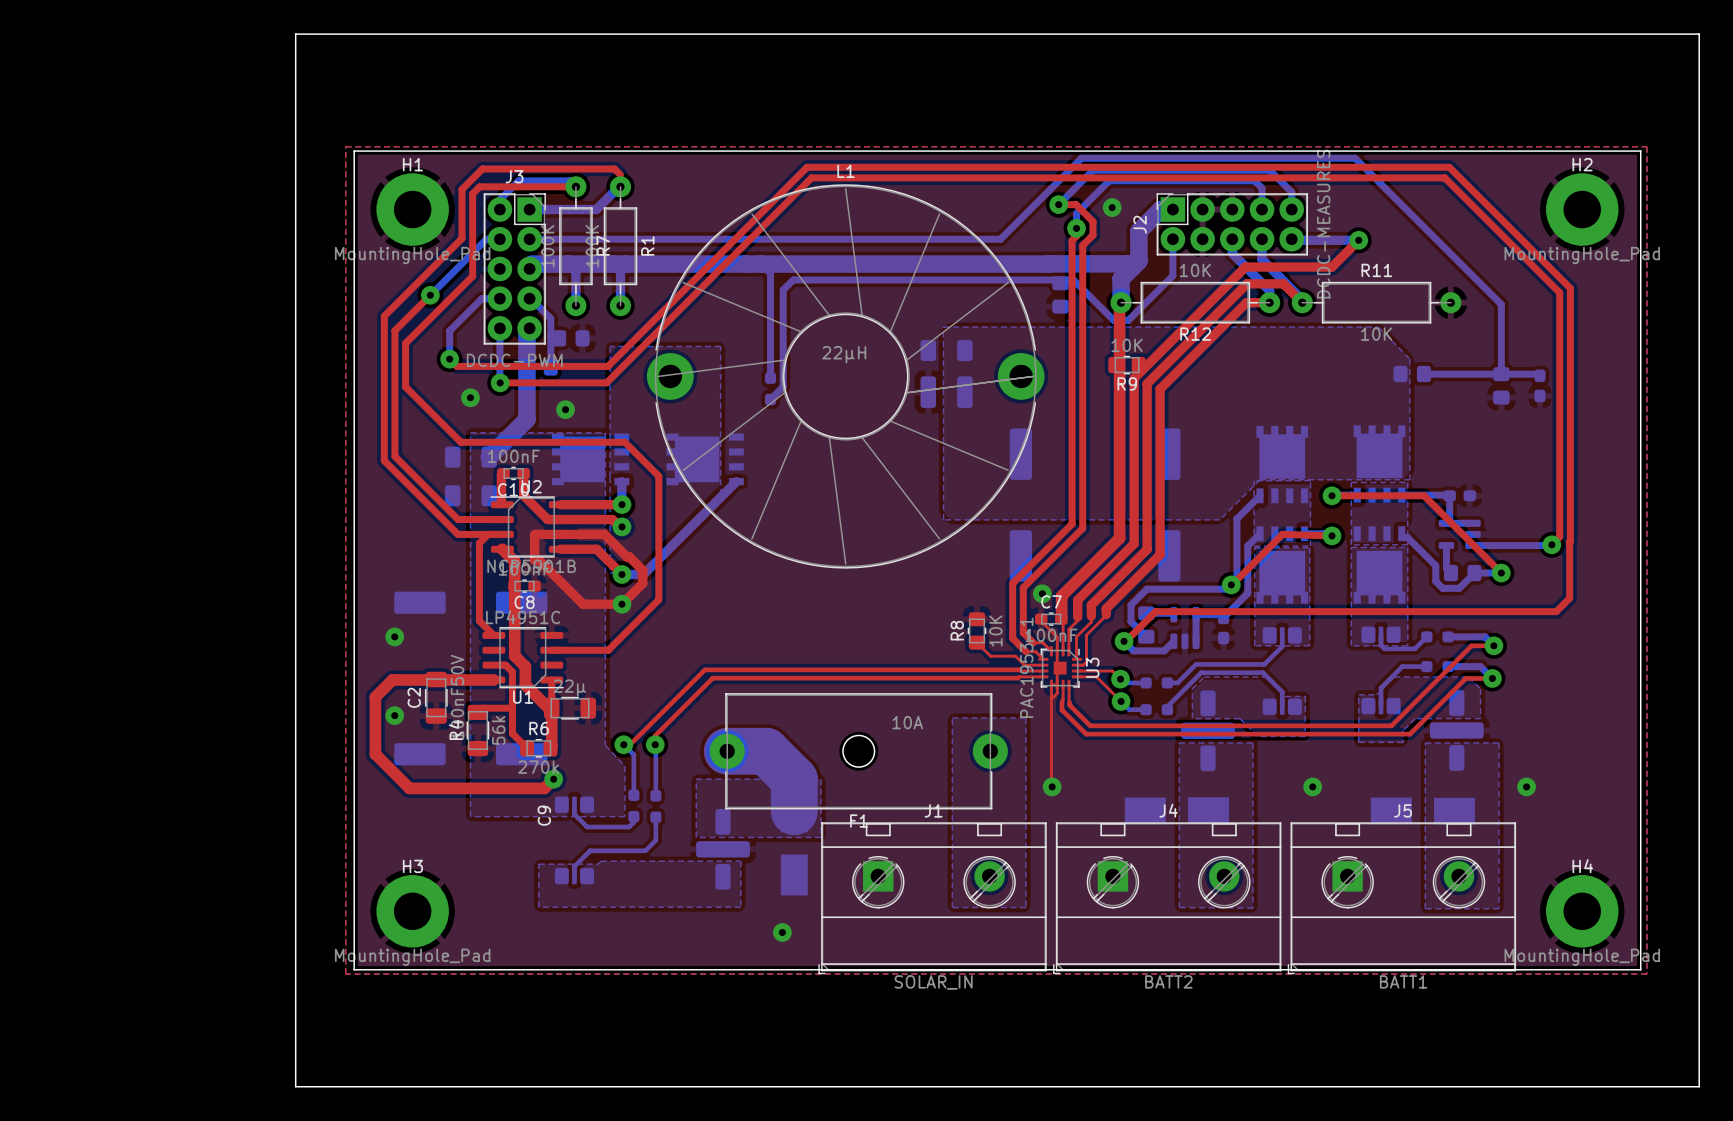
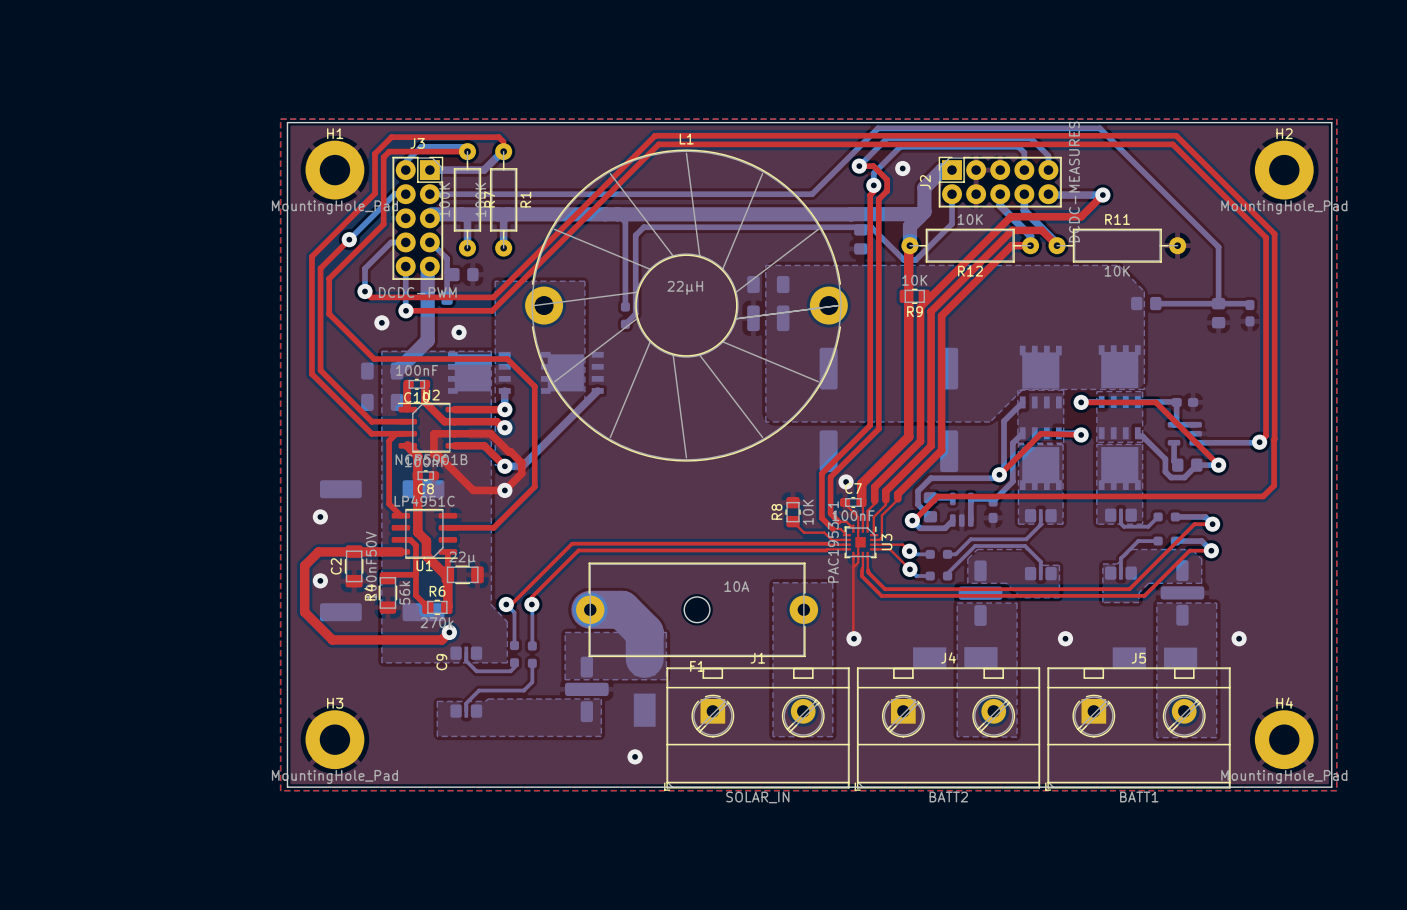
board edge: (295, 34) (1699, 34) (1699, 1086) (295, 1086) (295, 34) -> none

